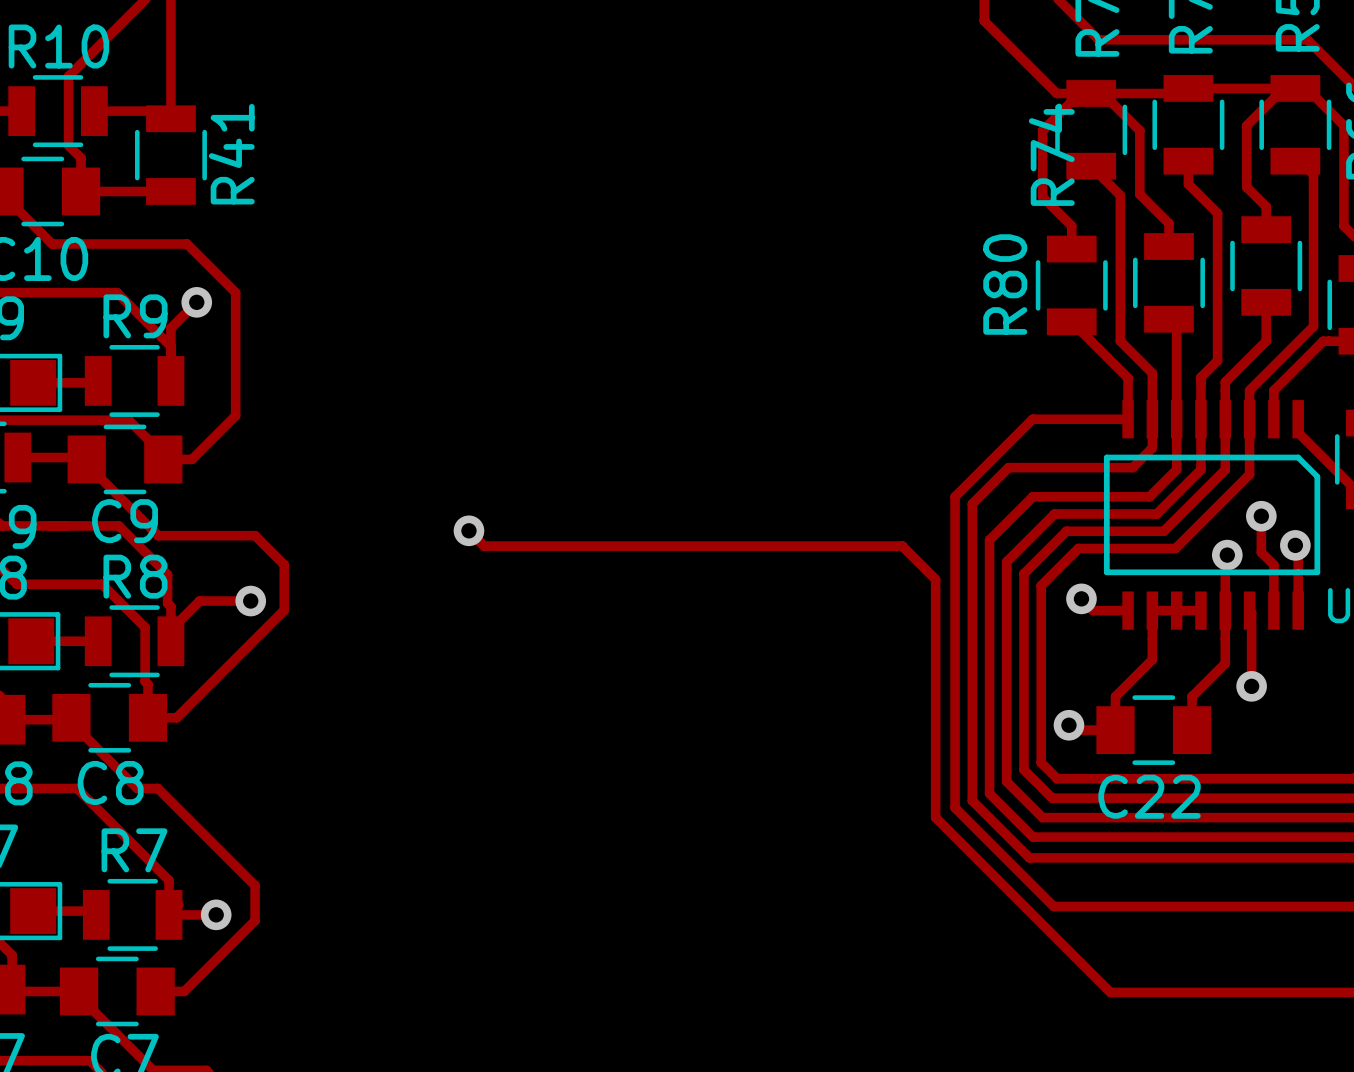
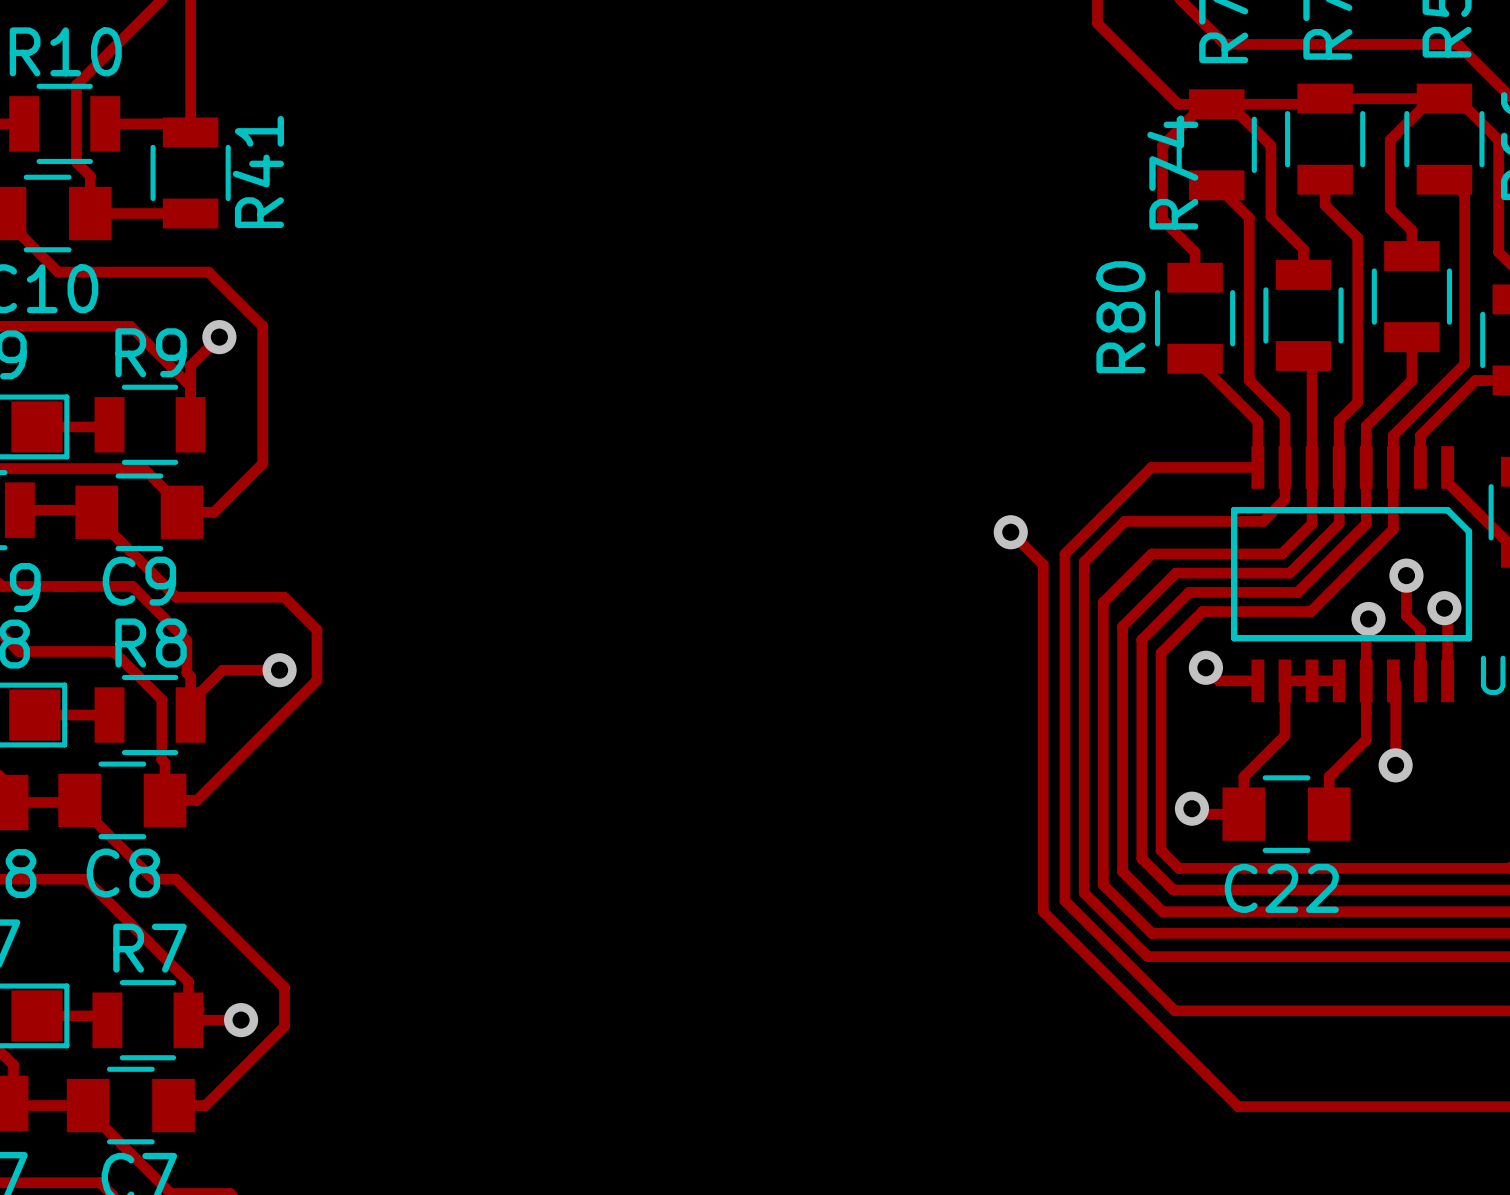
via: none -> (1010, 532)
track: (468, 530) (484, 546) (902, 546) (935, 579) -> (1010, 532) (1043, 564) (1043, 646)
via: (468, 530) -> none

